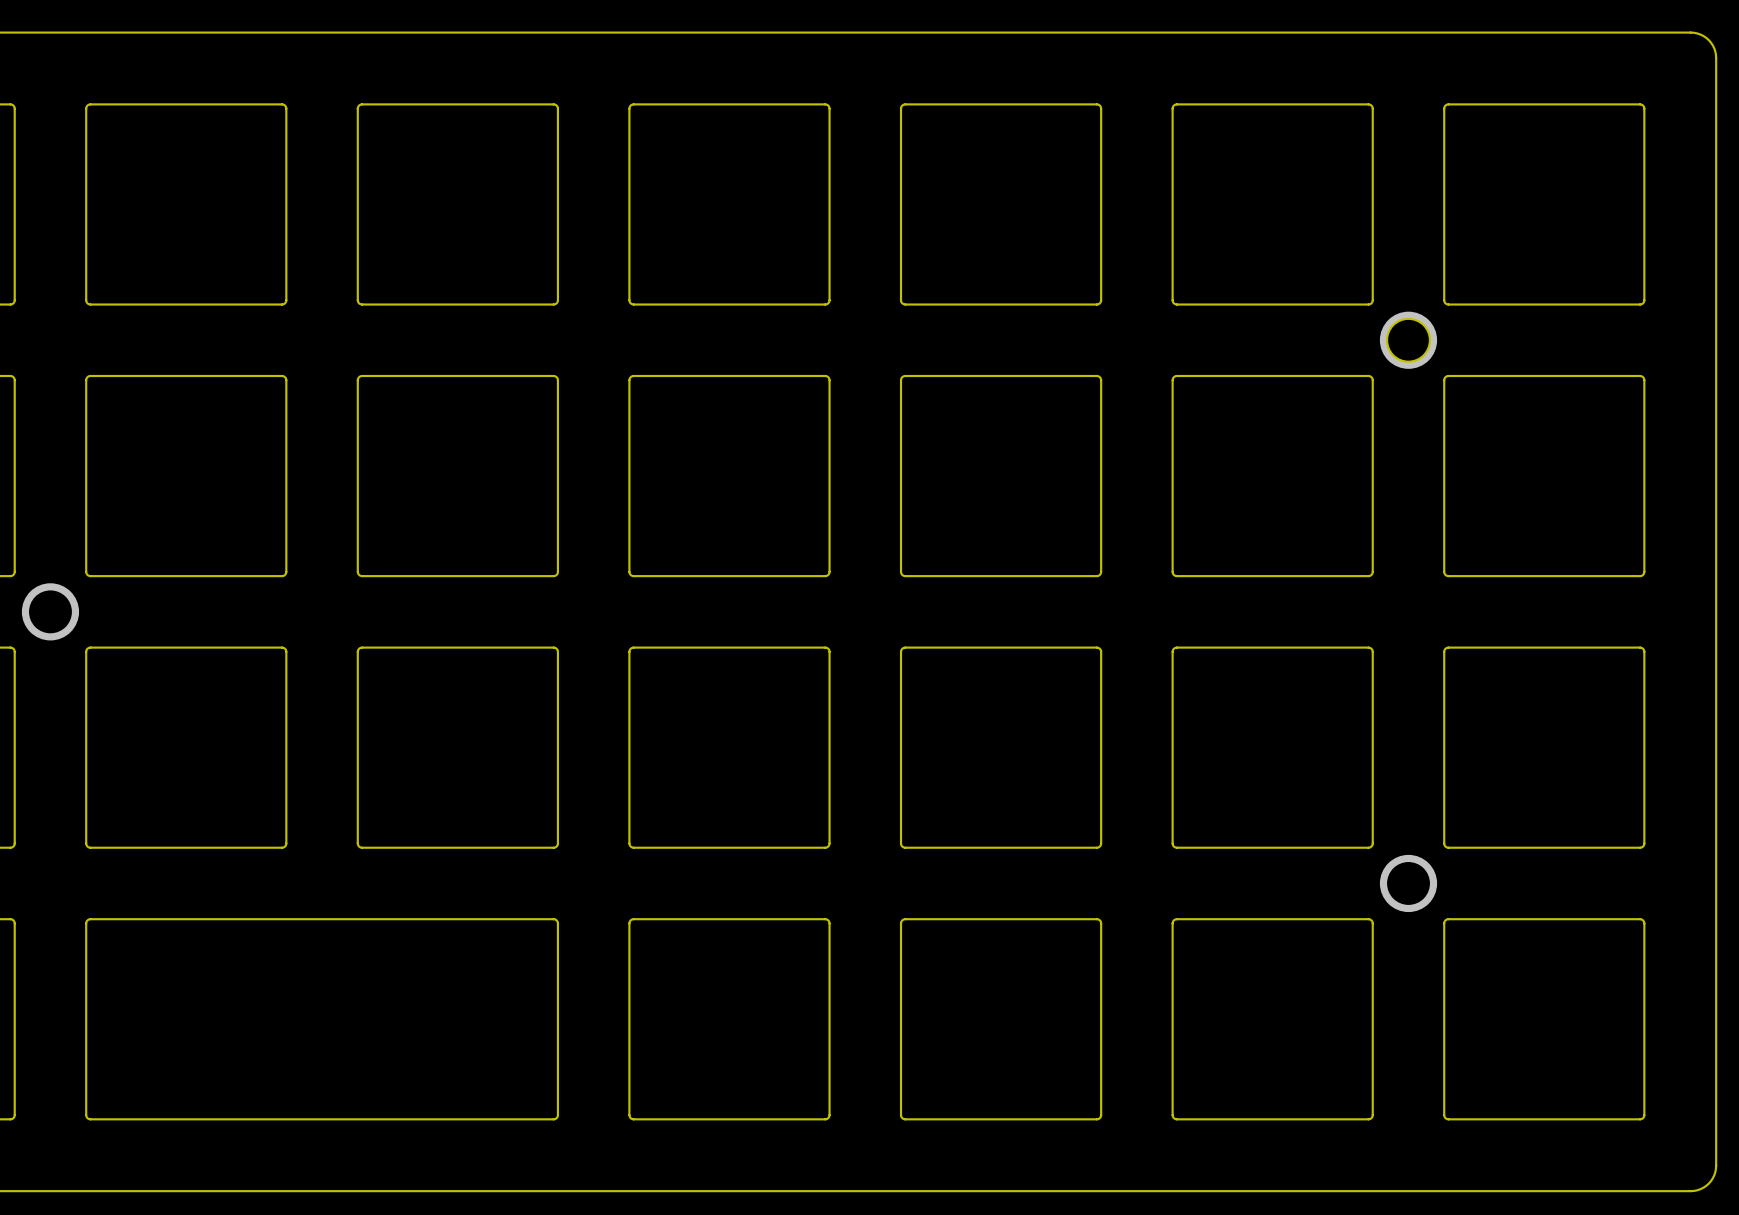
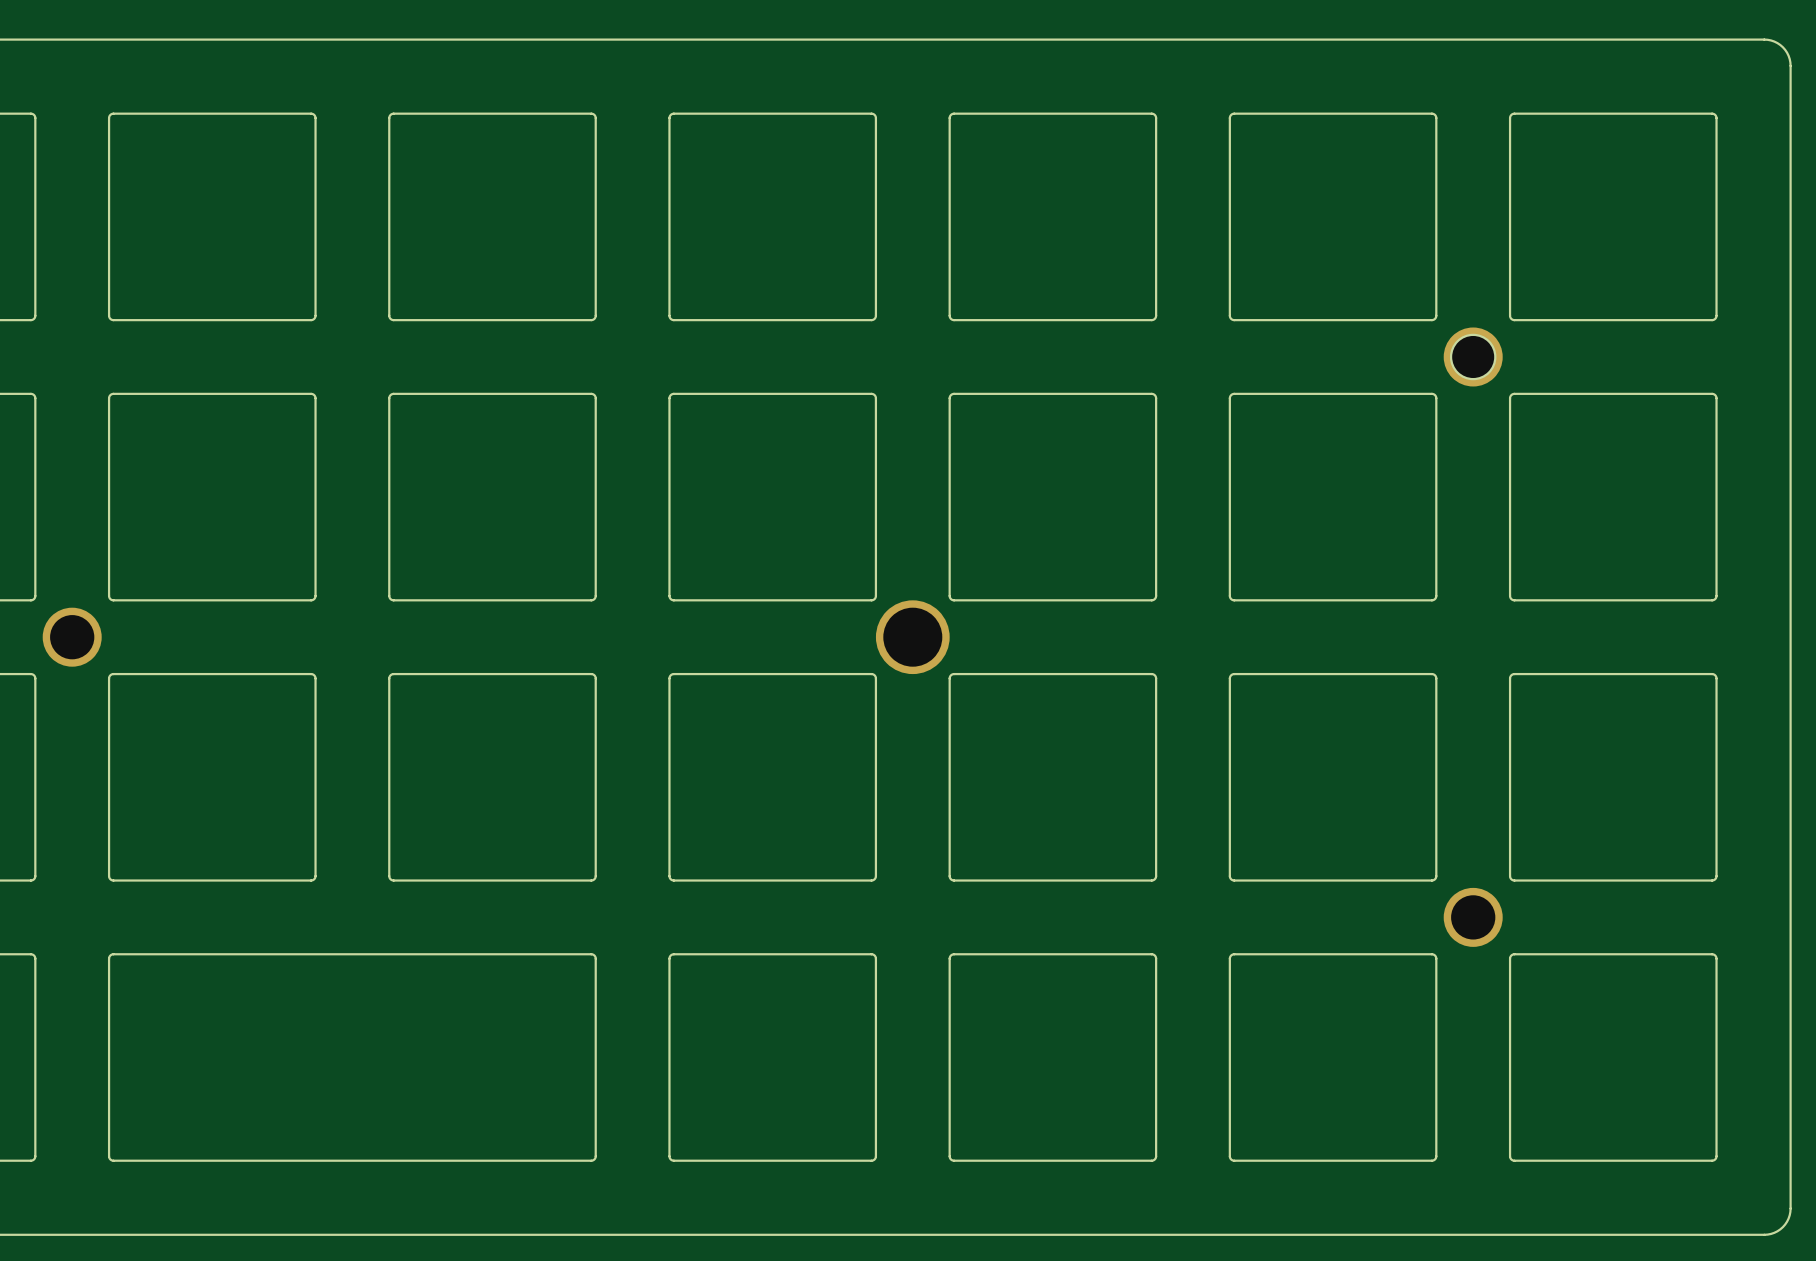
via: none -> (912, 637)

